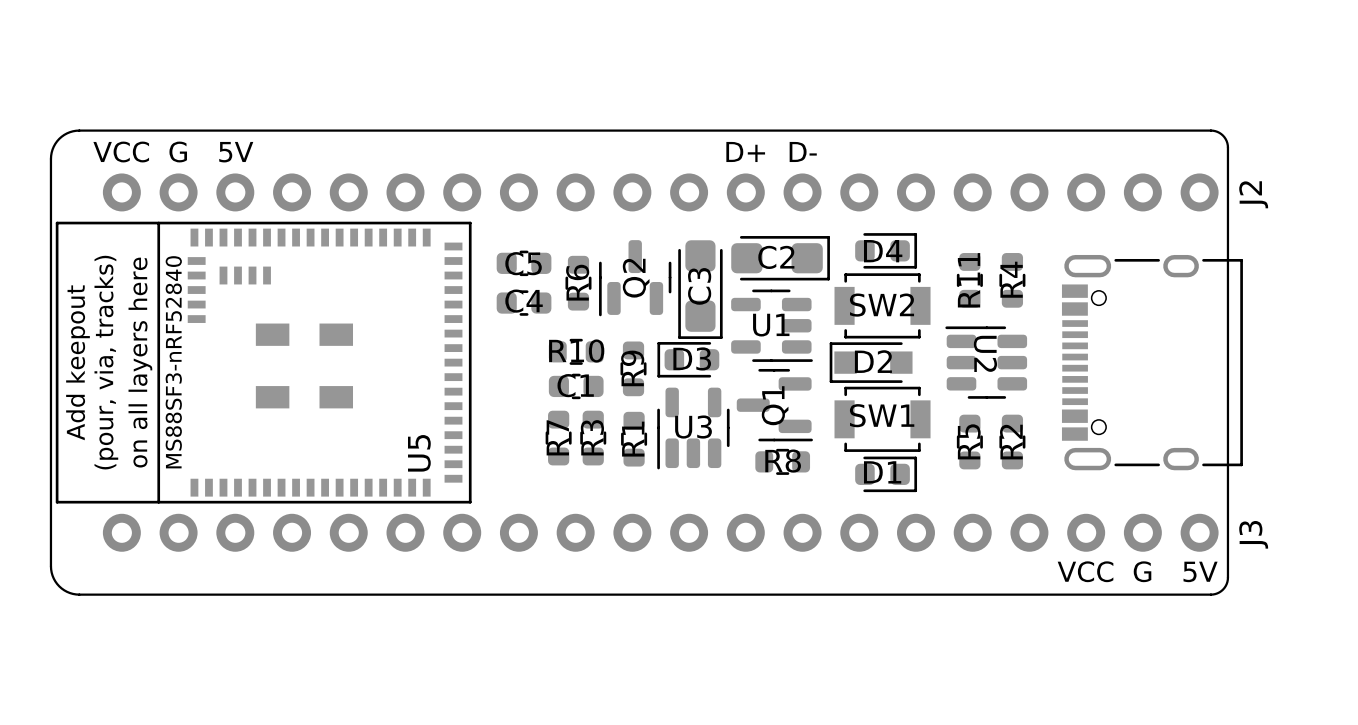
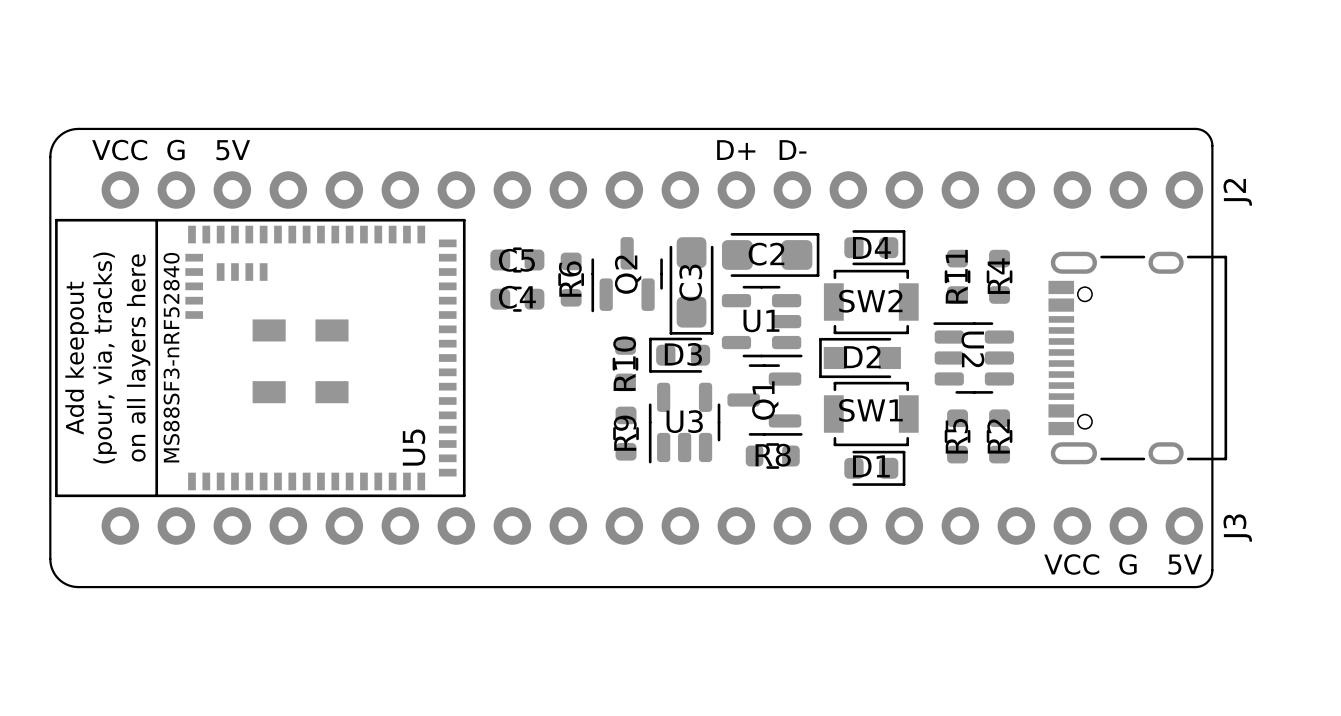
R10: (576, 351) -> none
R9 name: R9 (632, 368) -> R10 (624, 363)
C1: (576, 386) -> none
R7: (558, 438) -> none
R3: (593, 438) -> none
R1 name: R1 (633, 439) -> R9 (625, 433)

